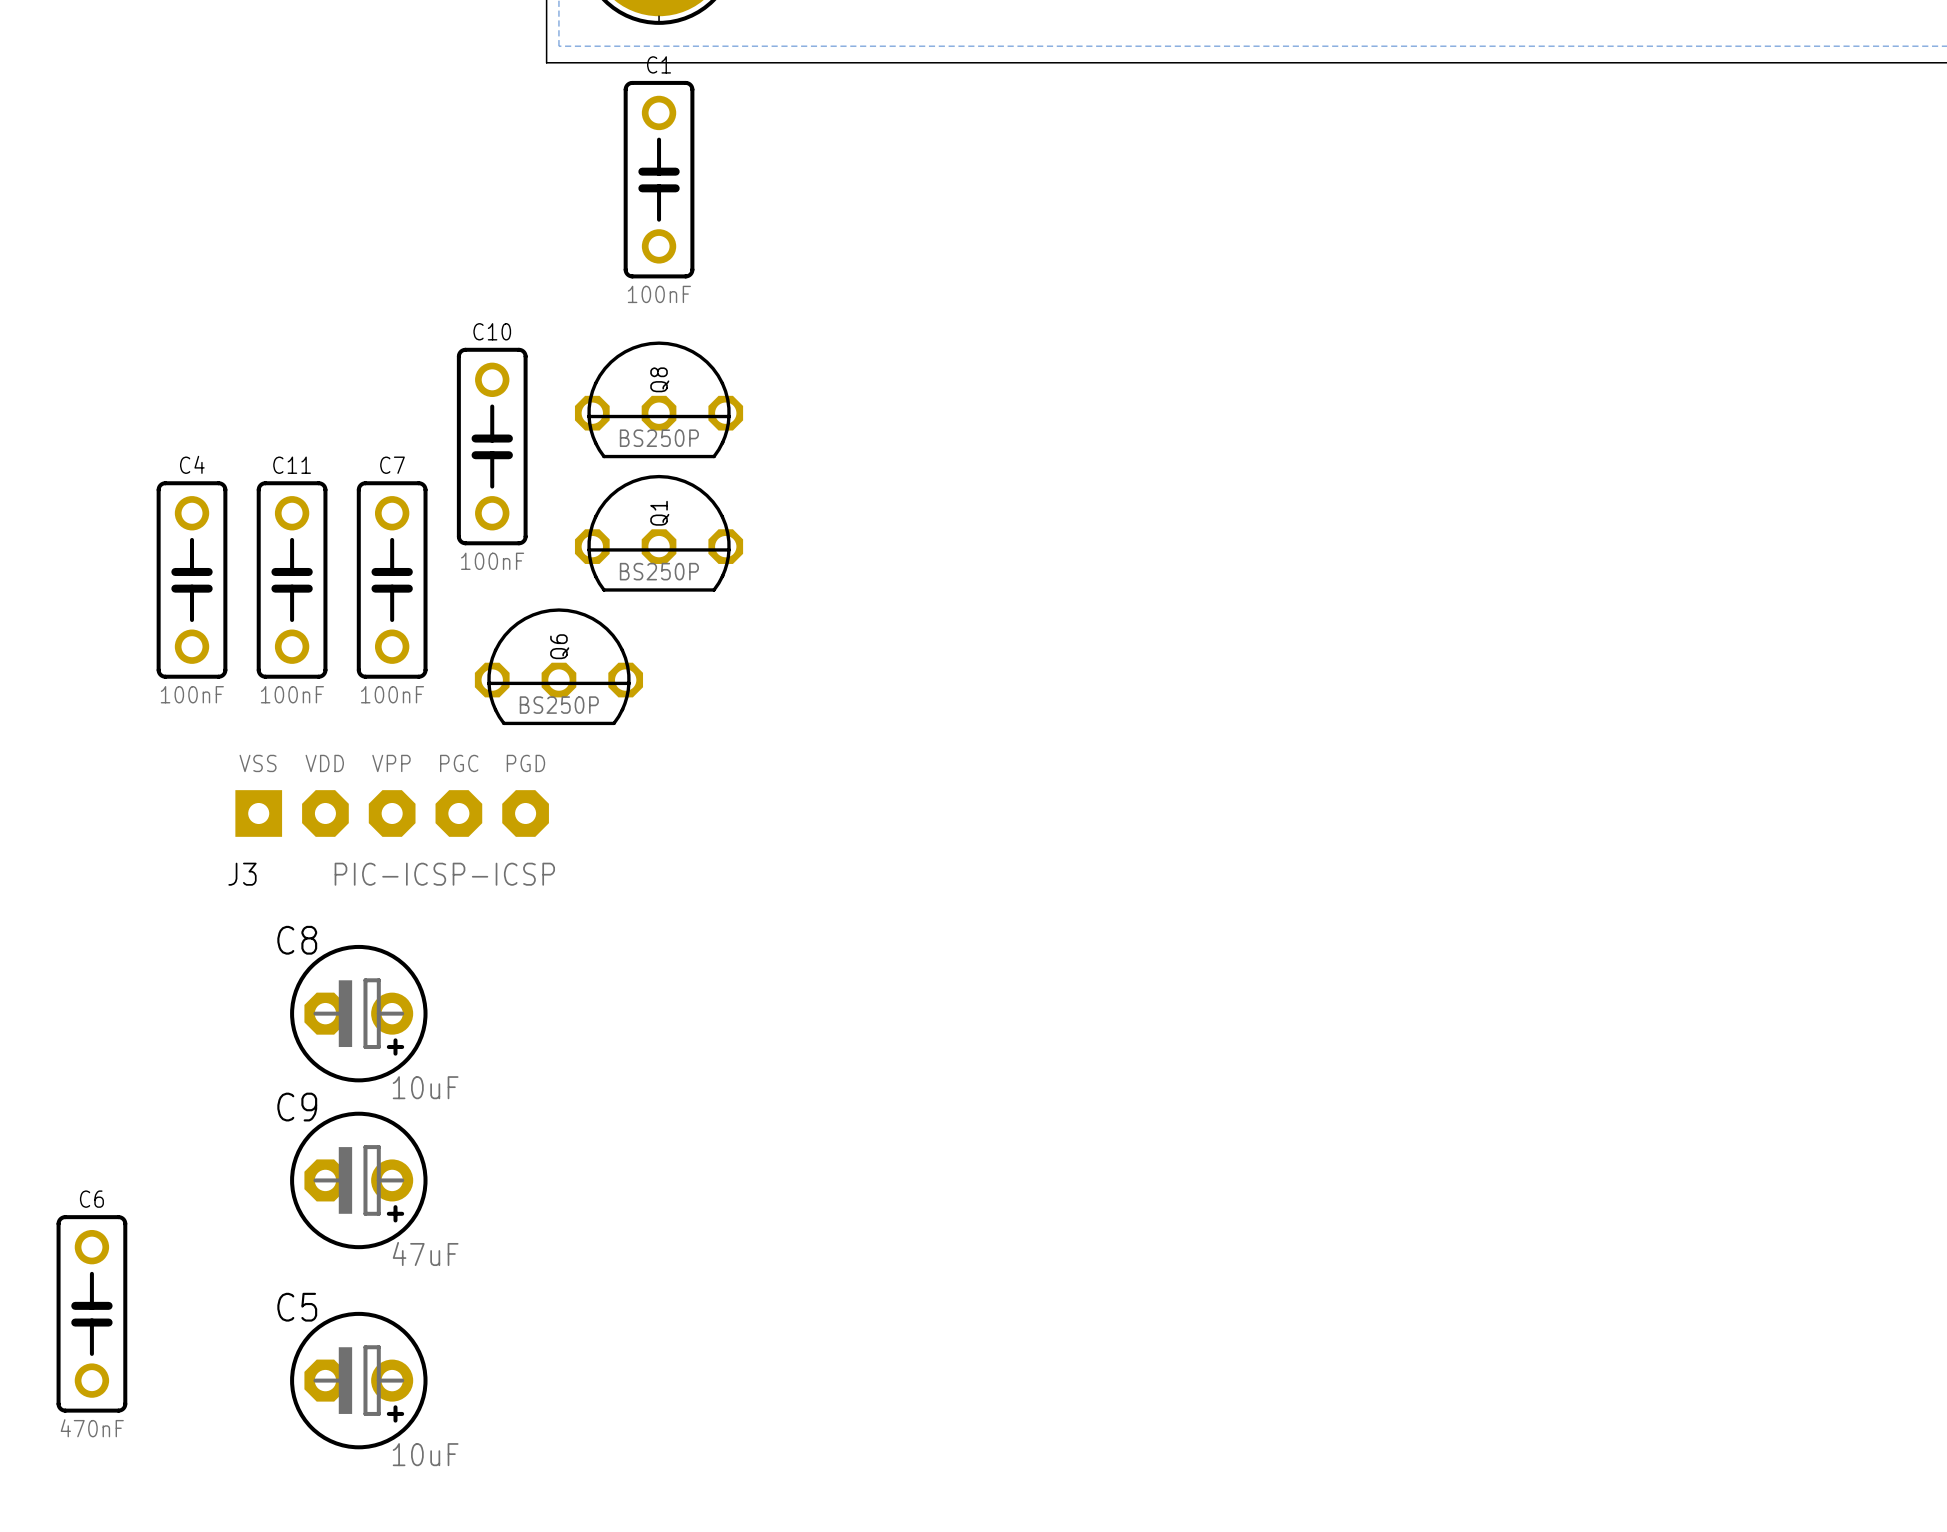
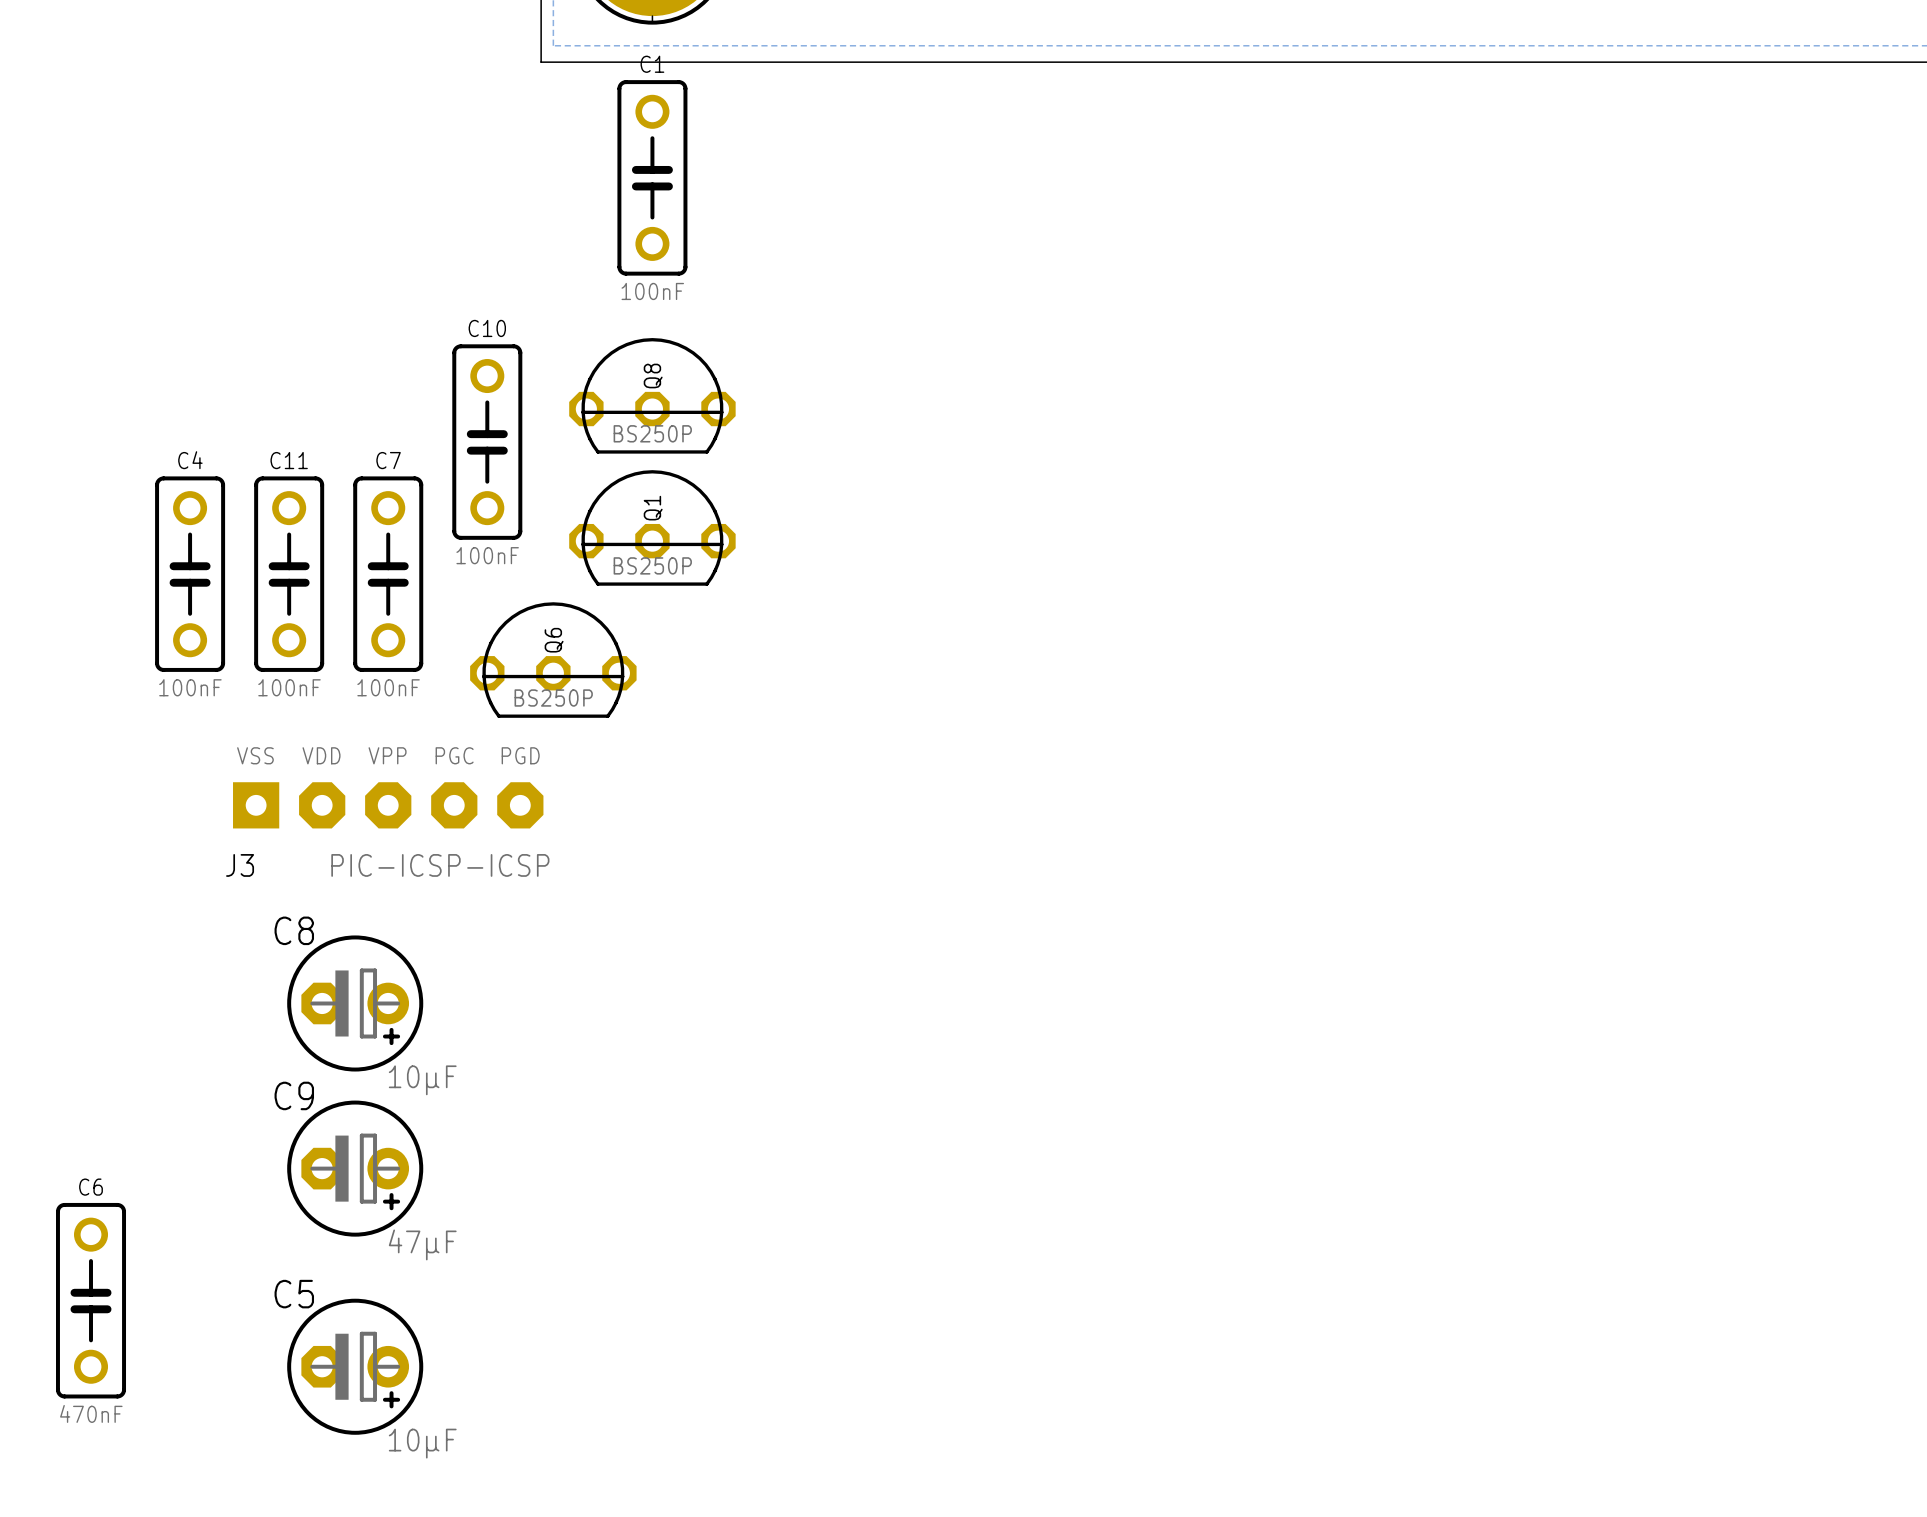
C8 value: 10uF (425, 1087) -> 10μF (422, 1080)
C9 value: 47uF (425, 1253) -> 47μF (422, 1244)
C5 value: 10uF (425, 1454) -> 10μF (422, 1443)

